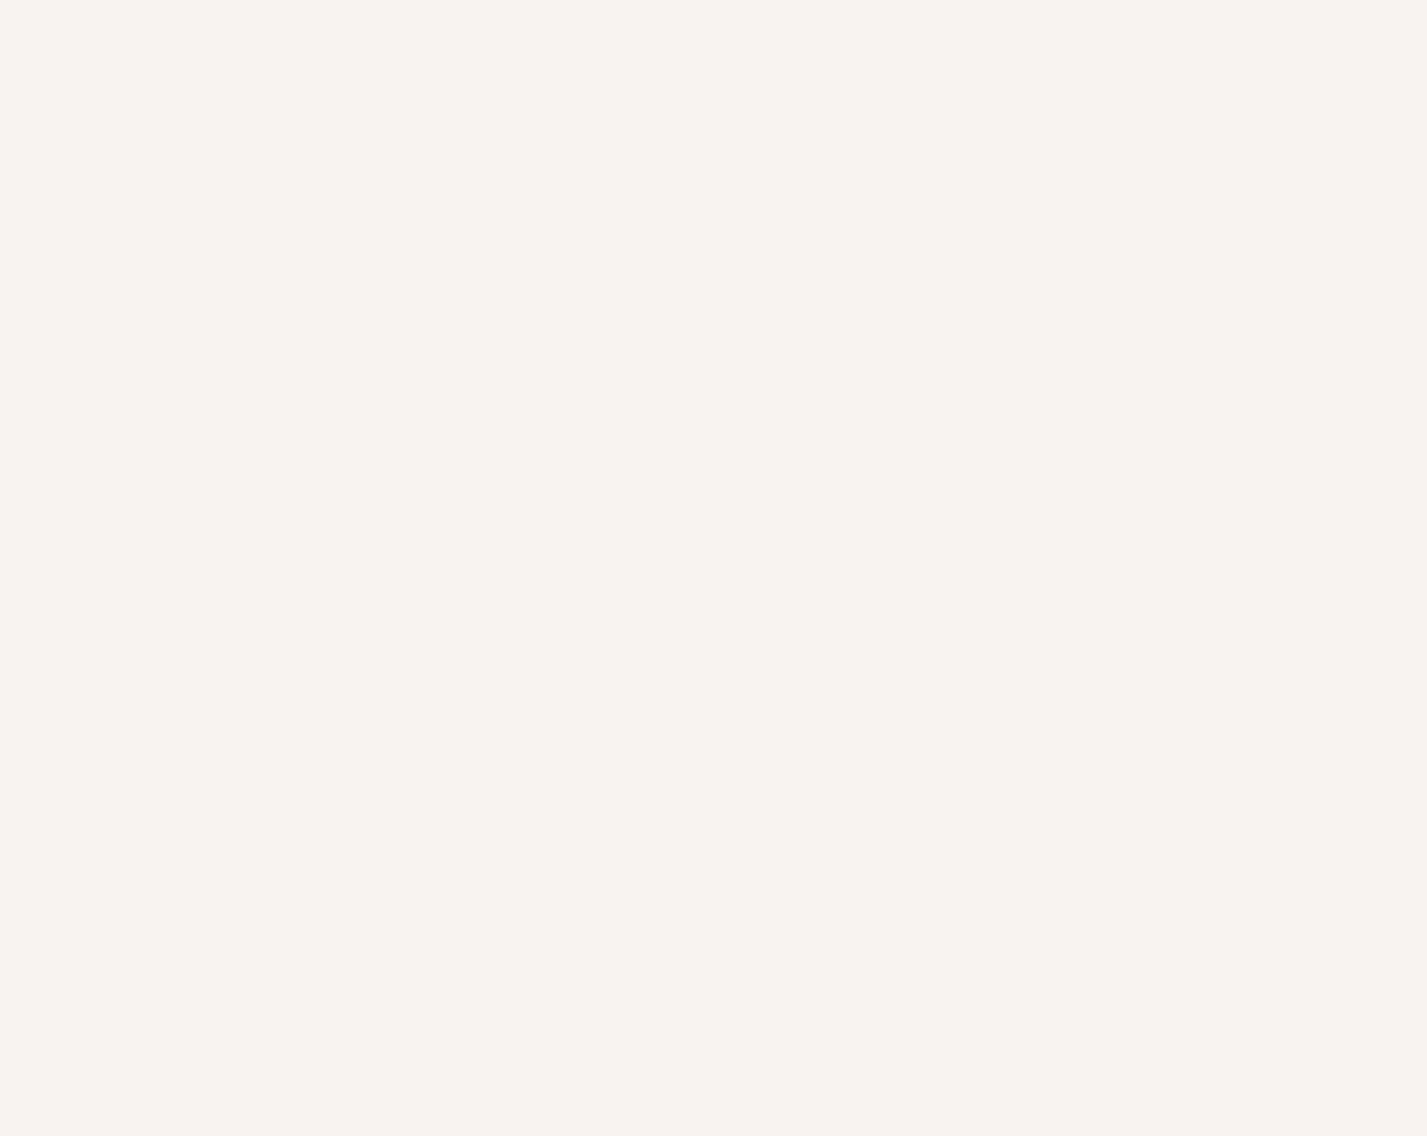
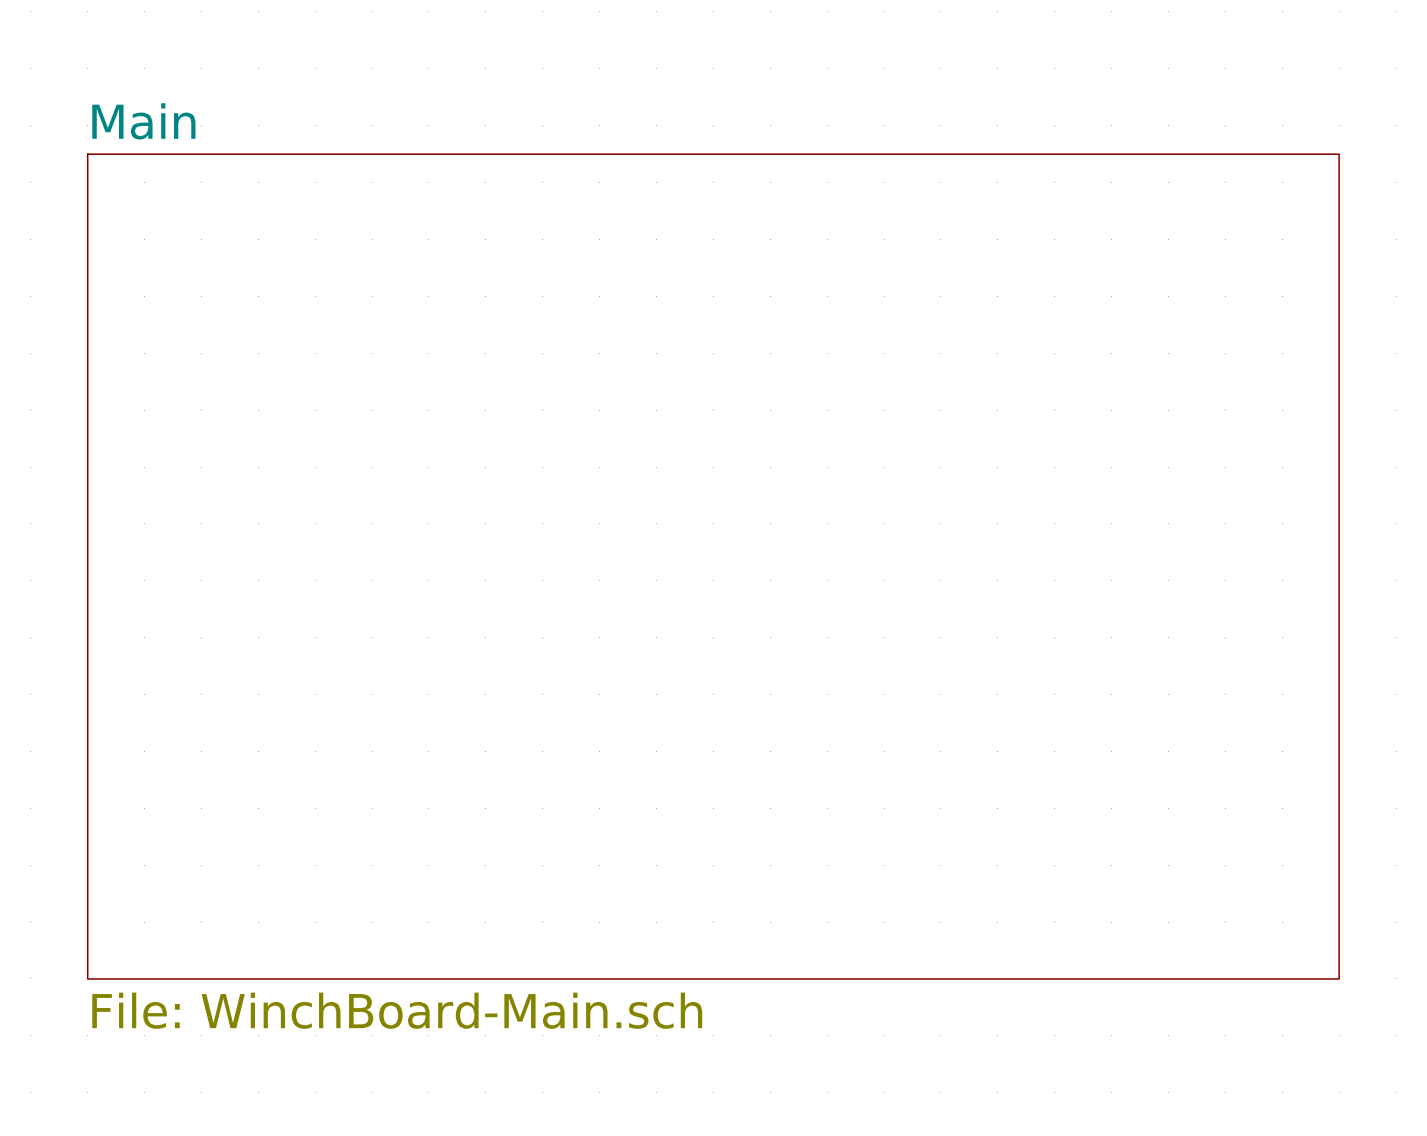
sheet Main: none -> File: WinchBoard-Main.sch (713, 566)

